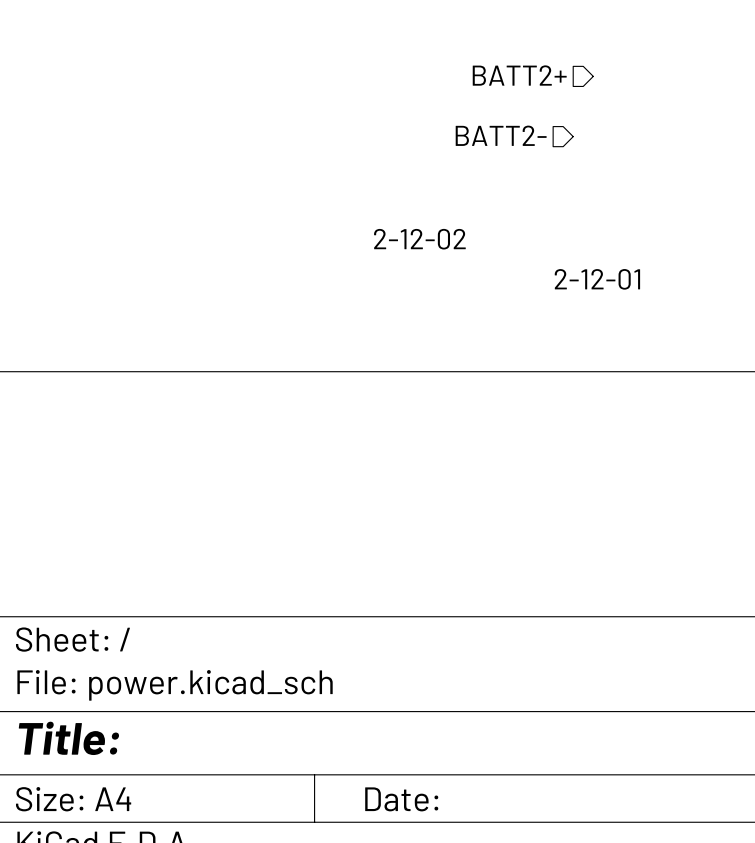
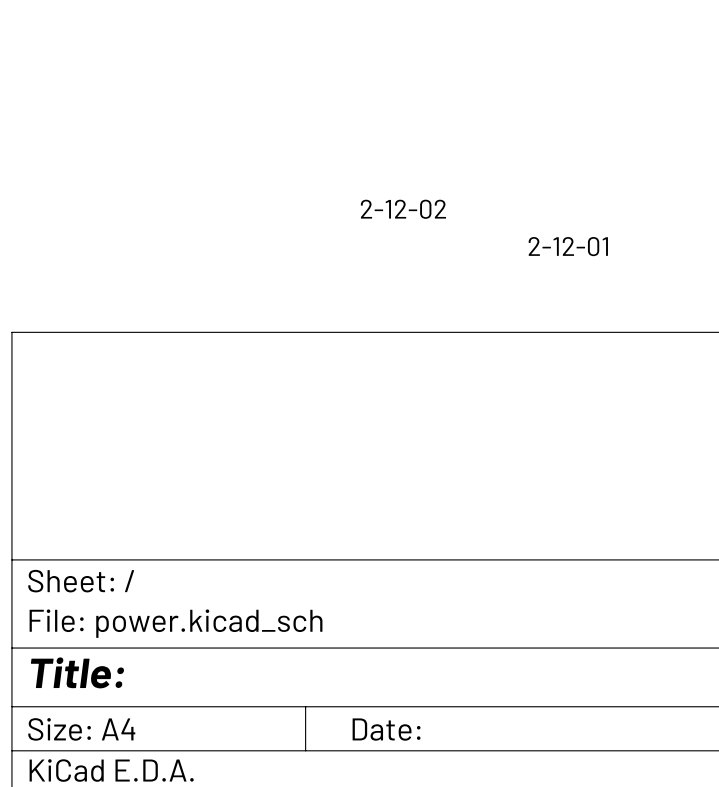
hierarchical label: BATT2+ (519, 75) -> none
hierarchical label: BATT2- (501, 135) -> none

